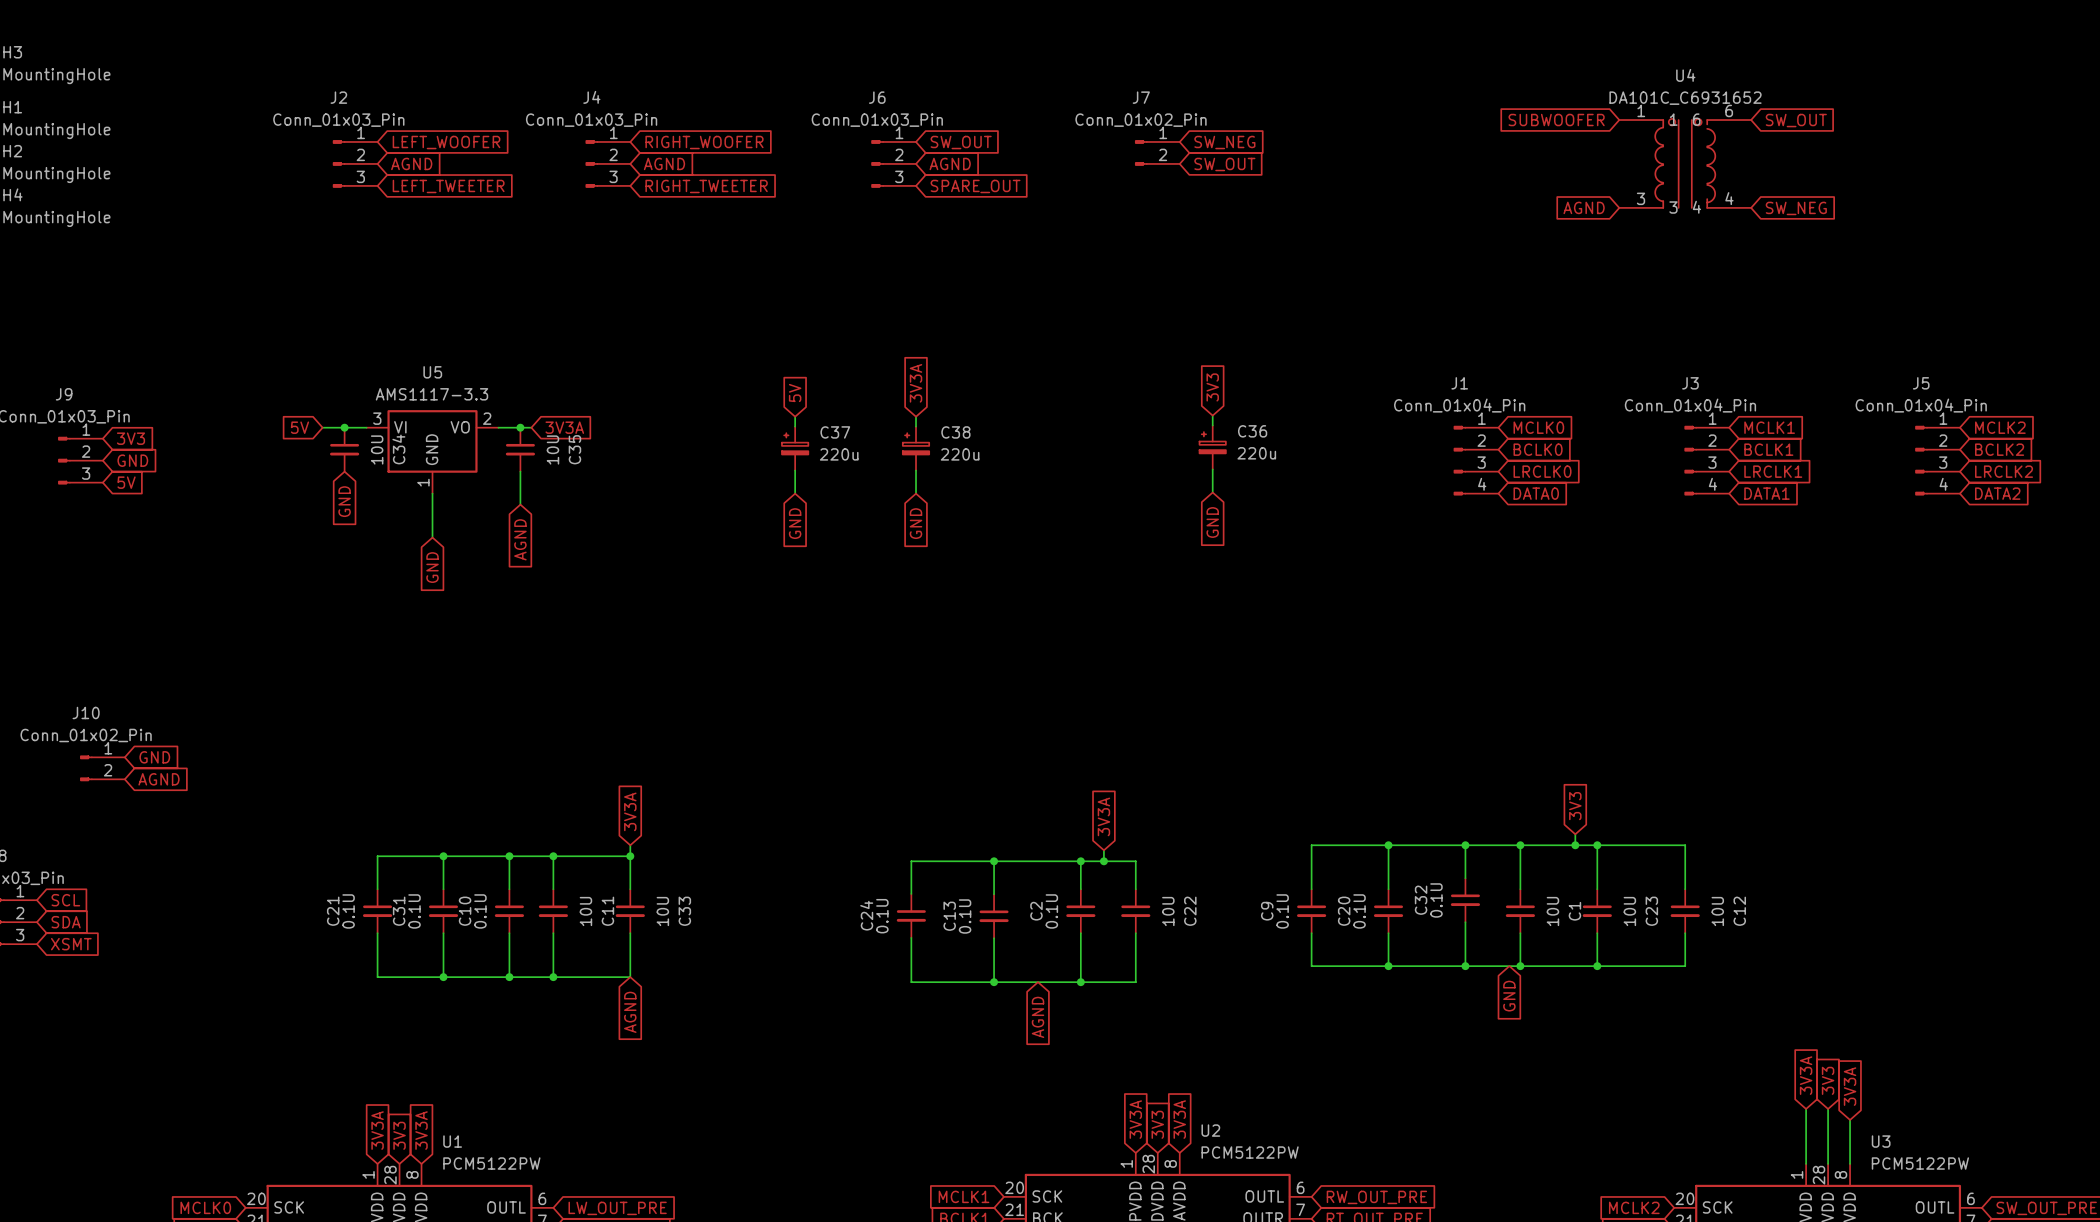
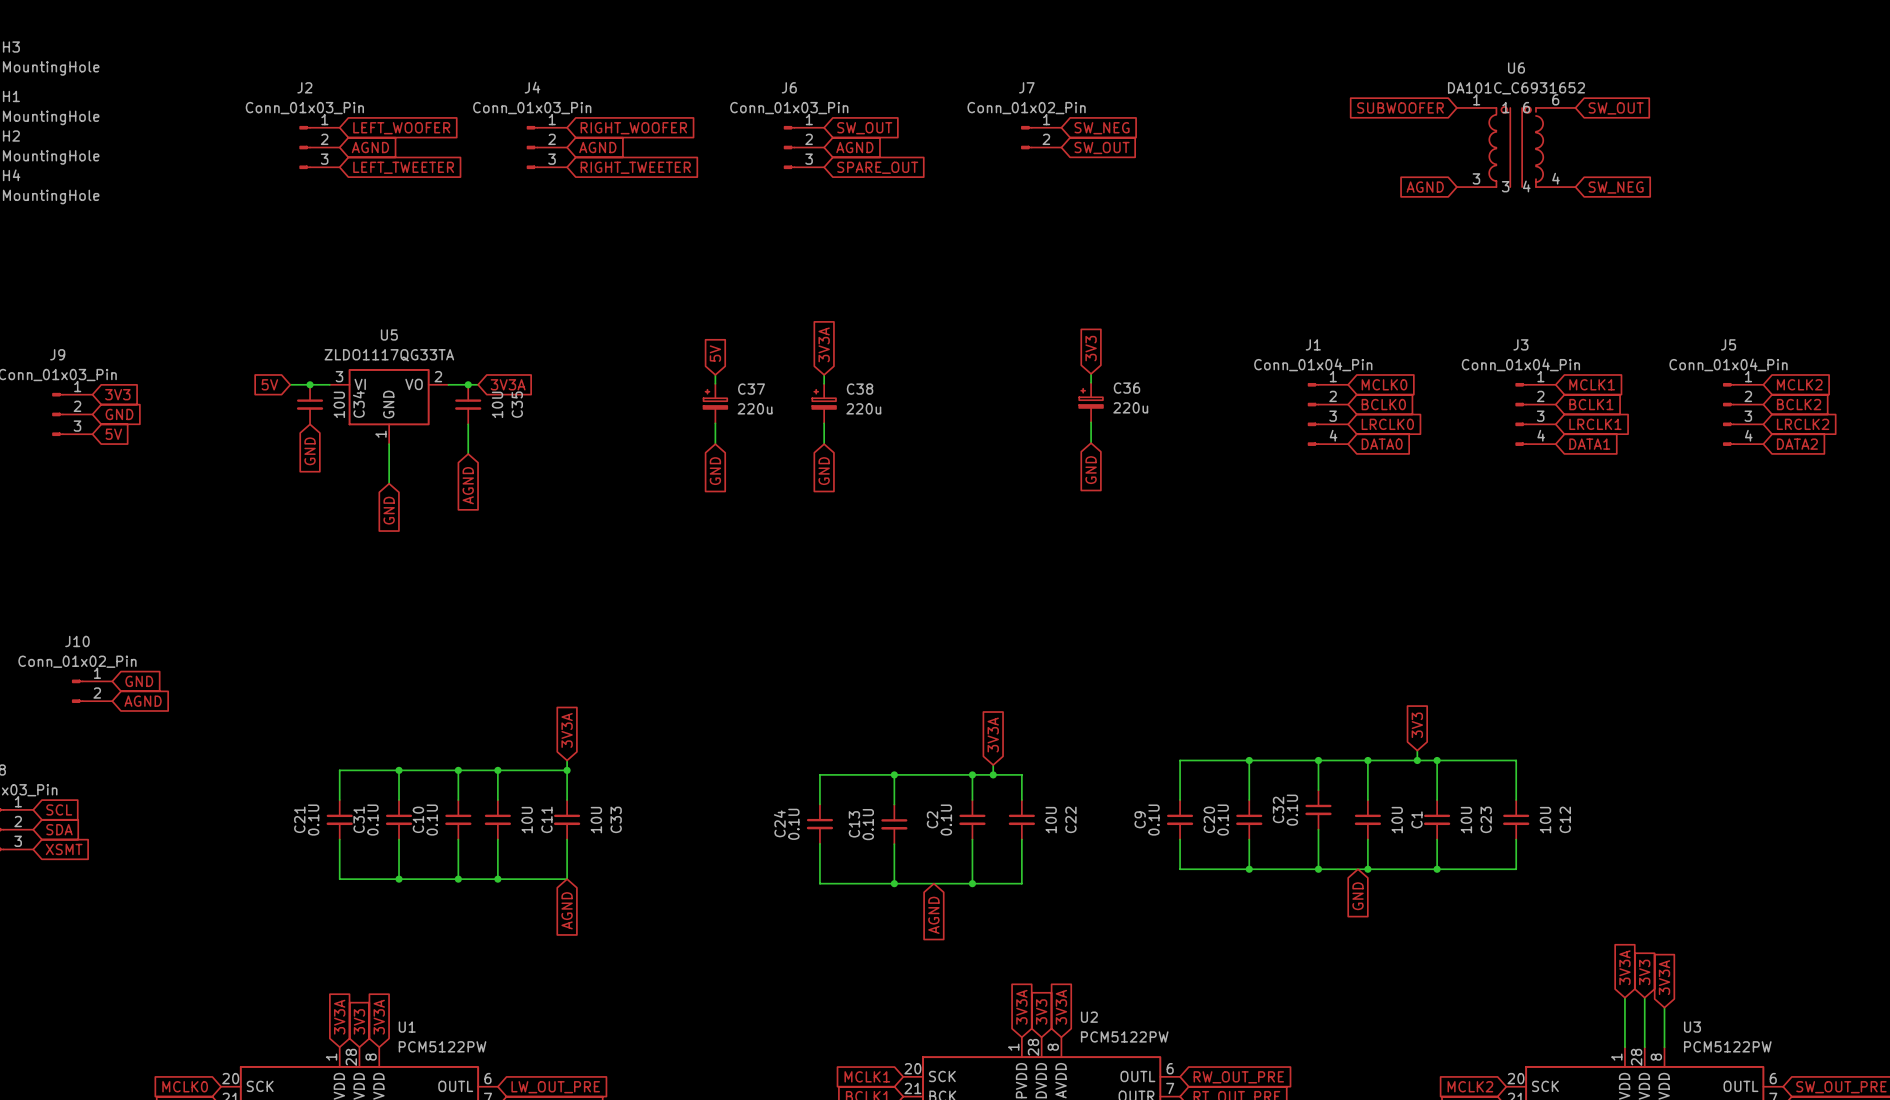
U4 name: U4 (1685, 75) -> U6 (1516, 68)
U5 value: AMS1117-3.3 (431, 394) -> ZLDO1117QG33TA (389, 355)

